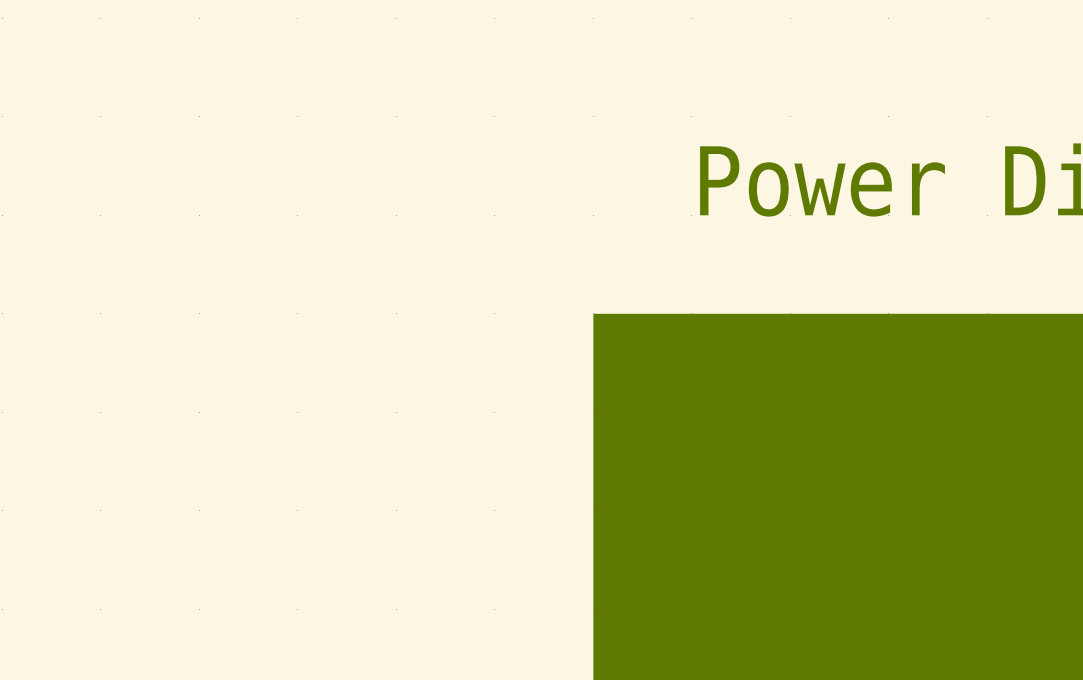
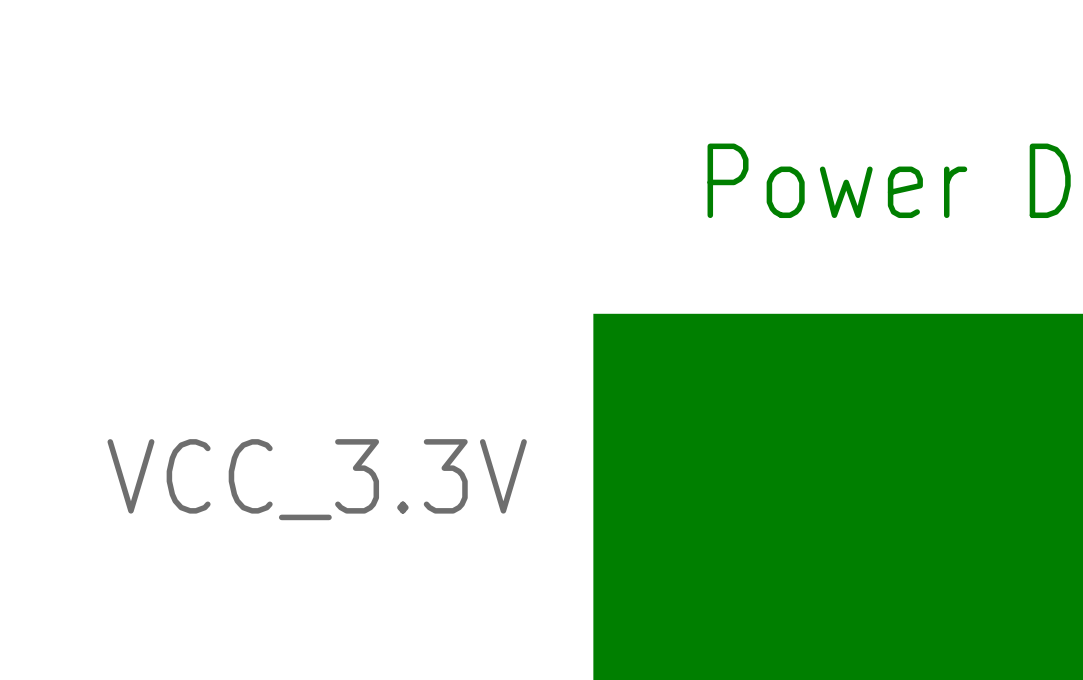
label: none -> VCC_3.3V (317, 479)

